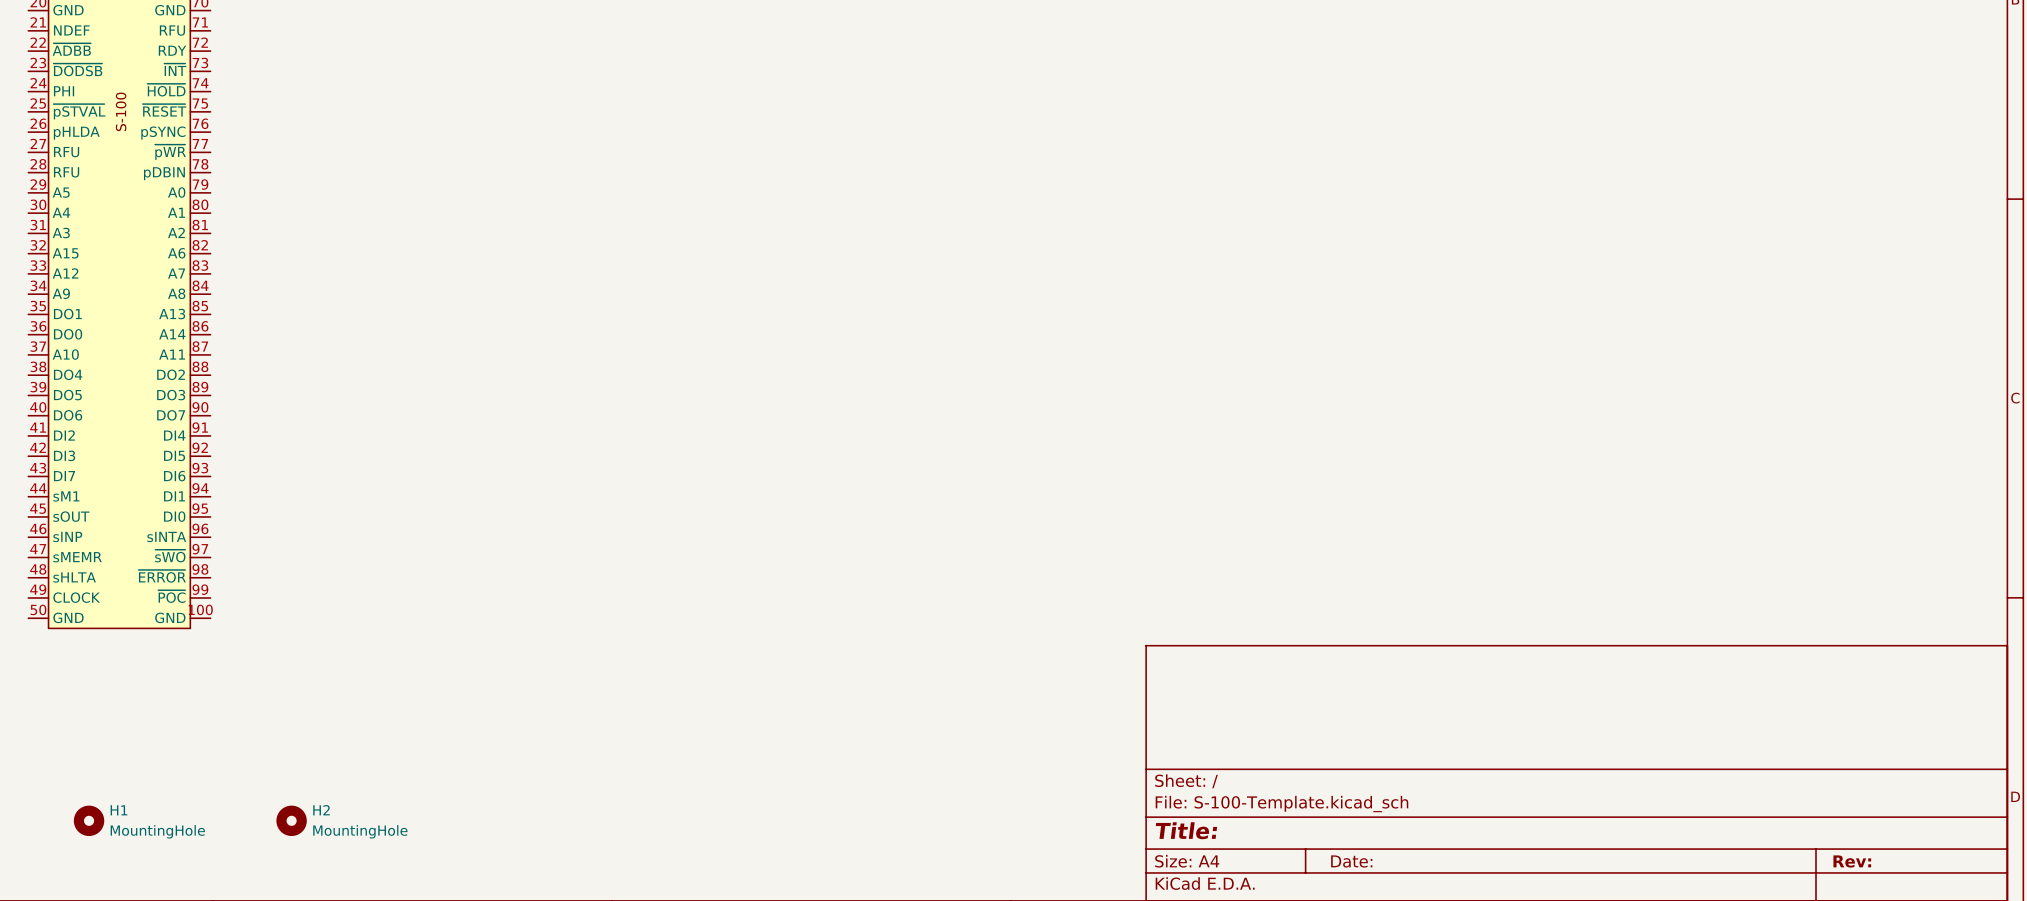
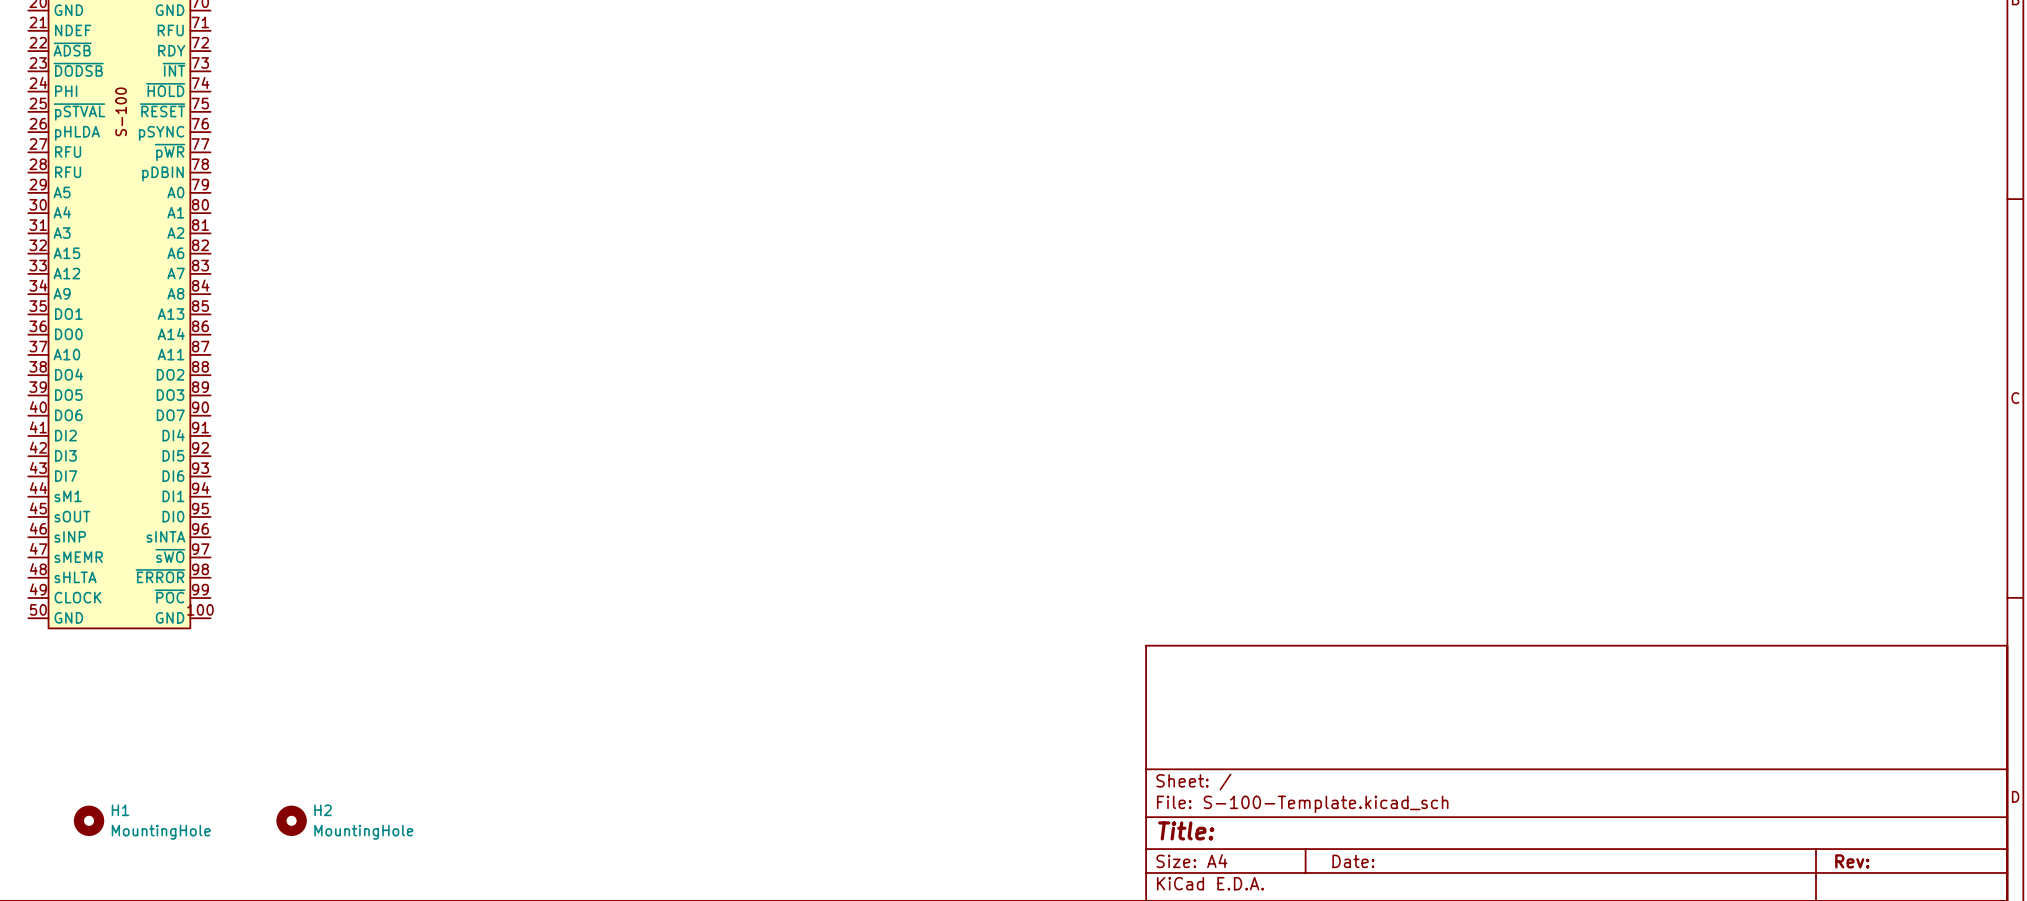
part pin name: ~{ADBB} (71, 49) -> ~{ADSB} (72, 49)

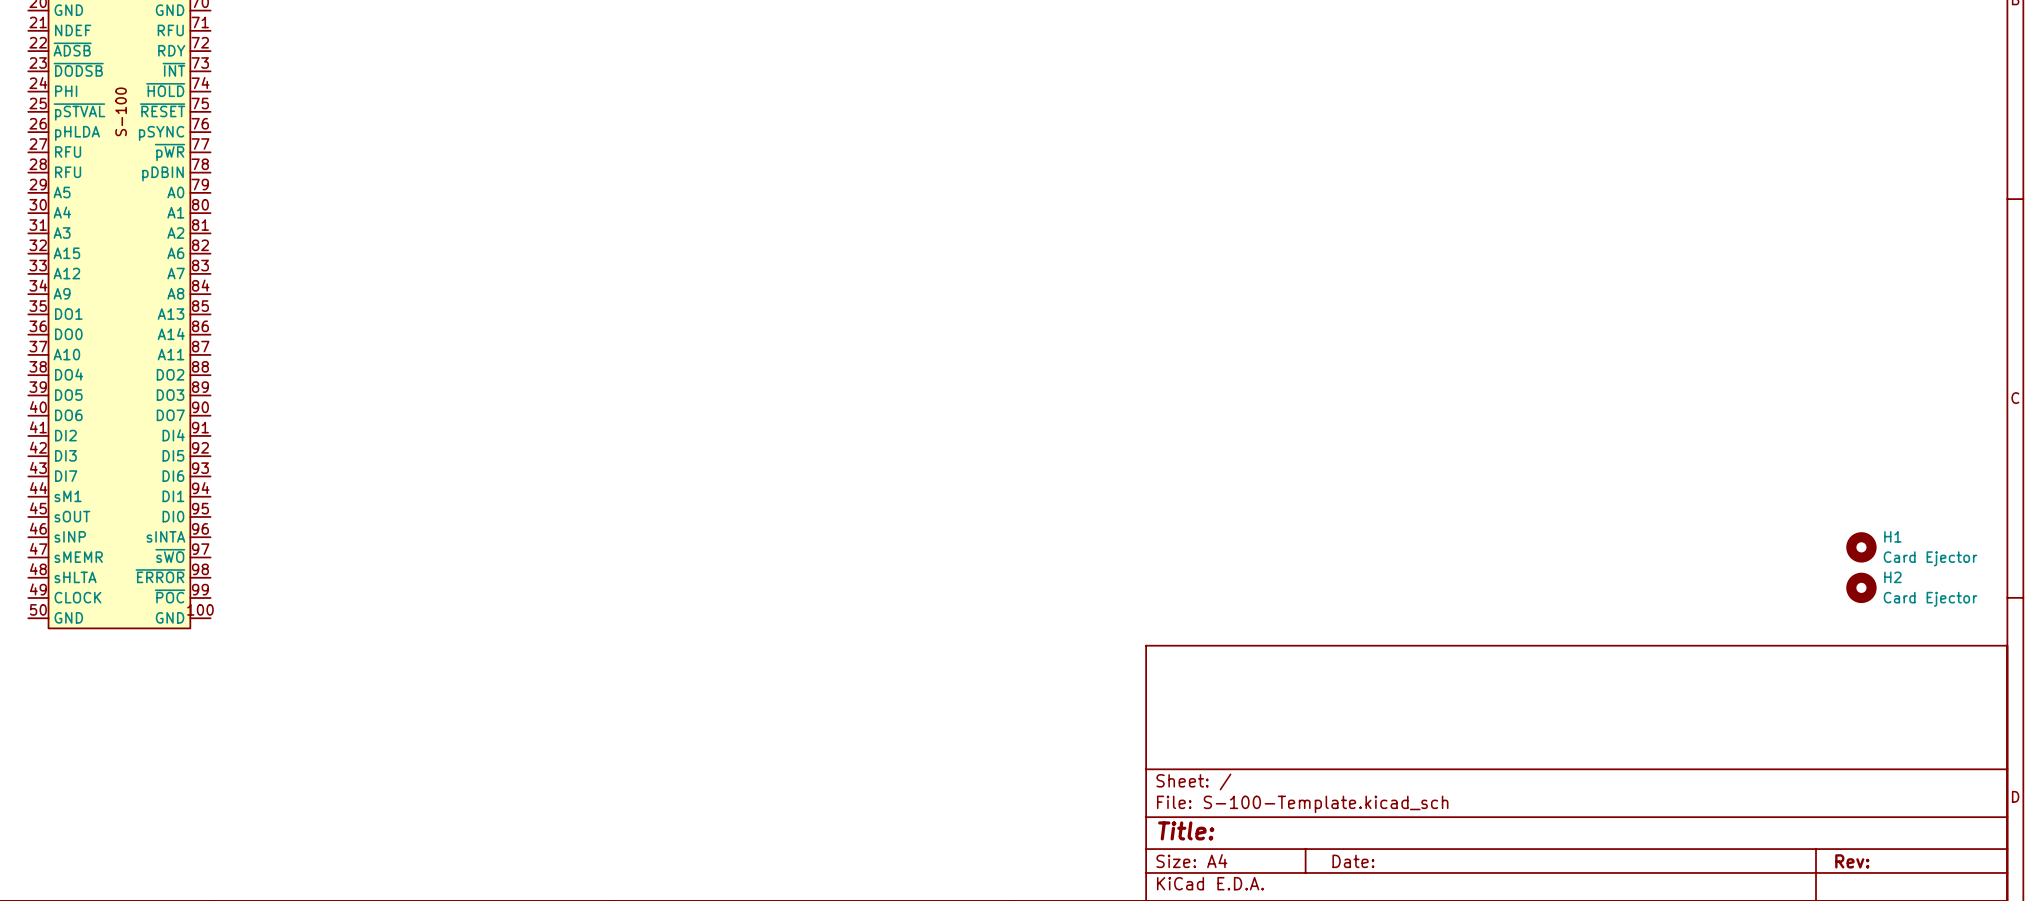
H1 position: (89, 820) -> (1861, 547)
H2 position: (291, 820) -> (1861, 587)
H1 value: MountingHole (161, 832) -> Card Ejector (1930, 558)
H2 value: MountingHole (363, 832) -> Card Ejector (1930, 599)

